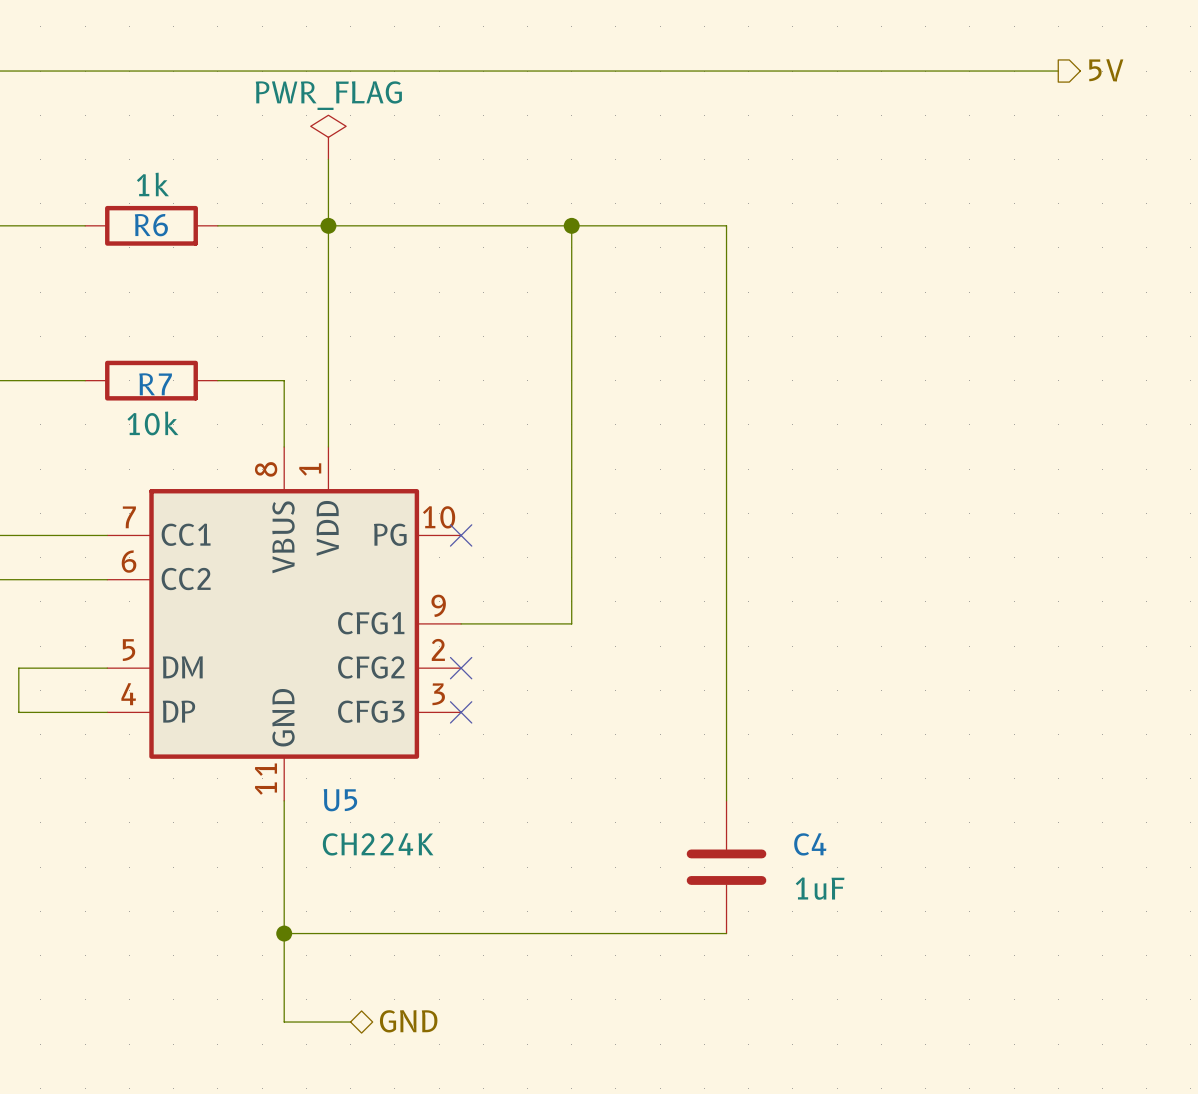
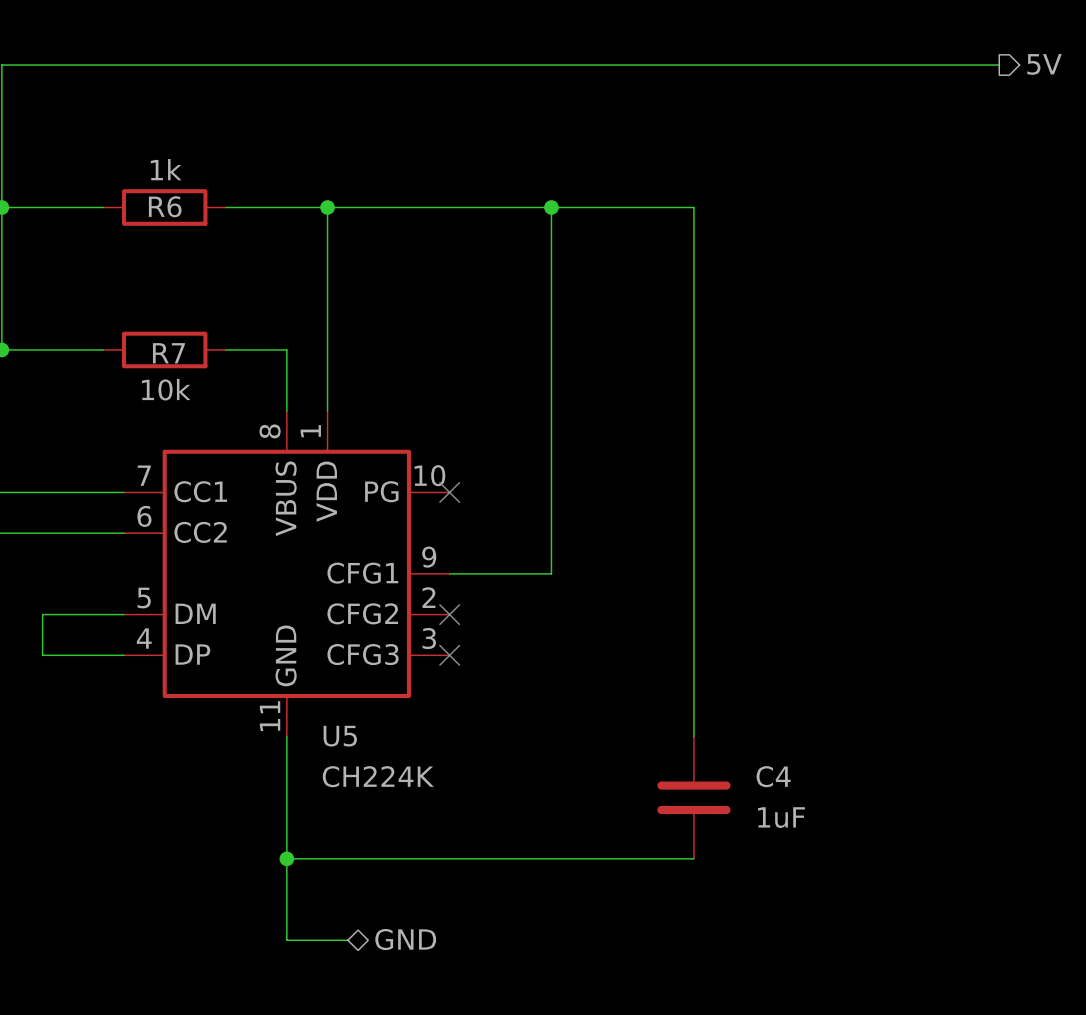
power symbol: PWR_FLAG (328, 137) -> none
wire: (328, 159) (328, 225) -> none

